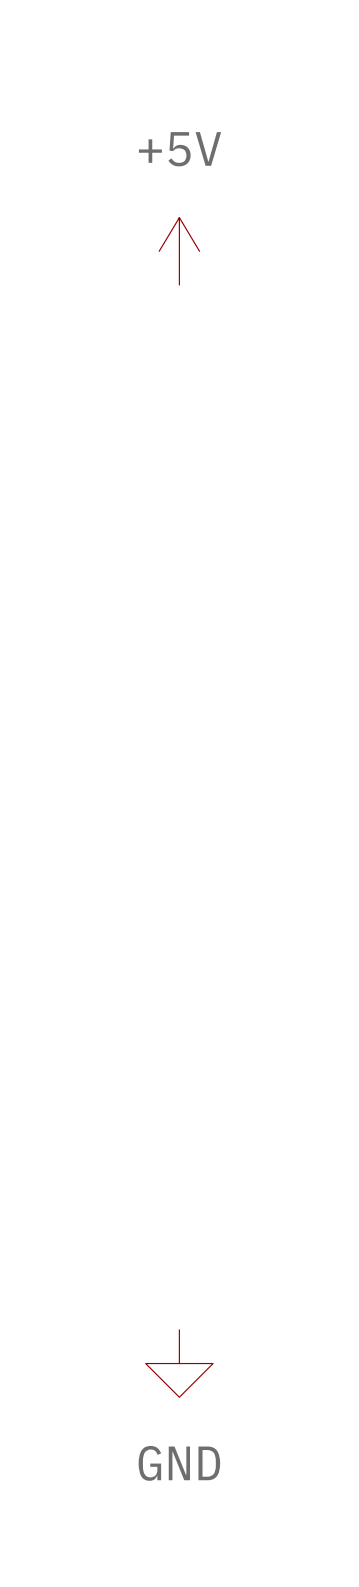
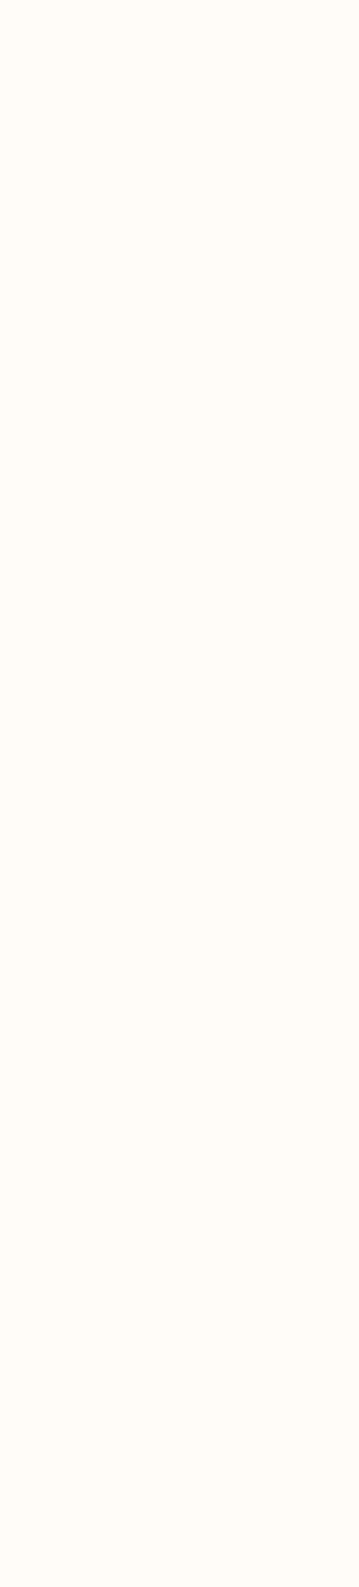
power symbol: +5V (179, 251) -> none
power symbol: GND (179, 1363) -> none

